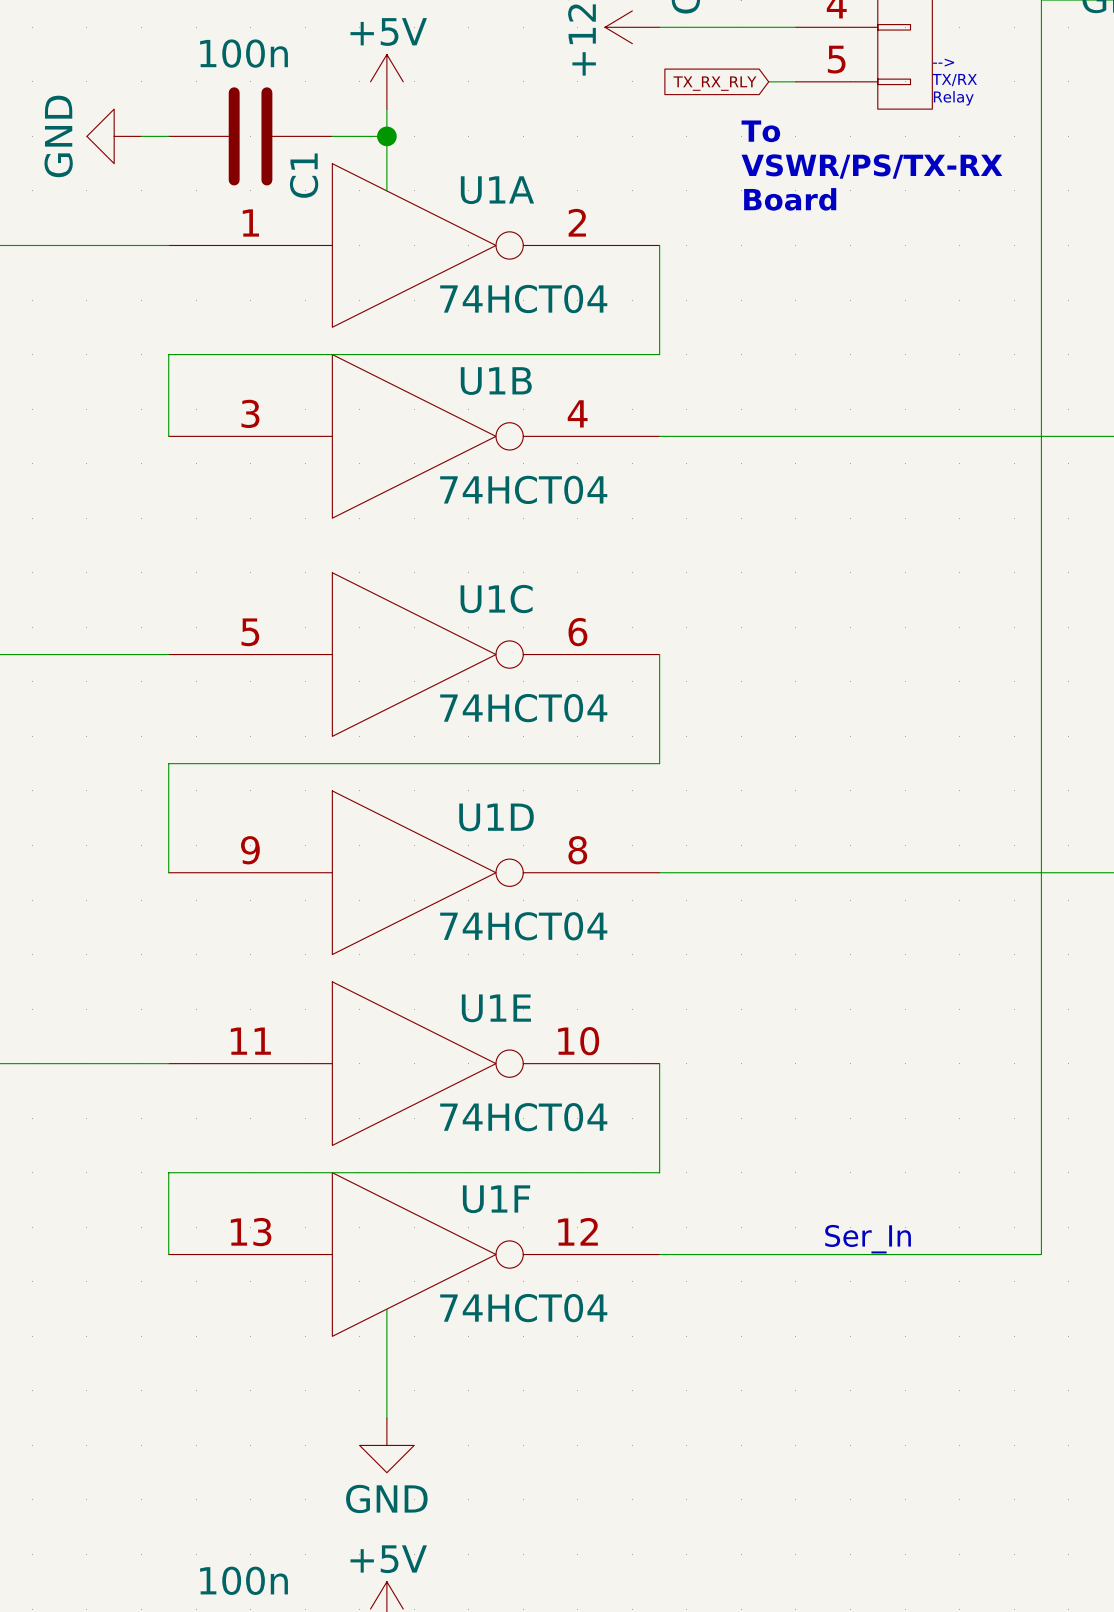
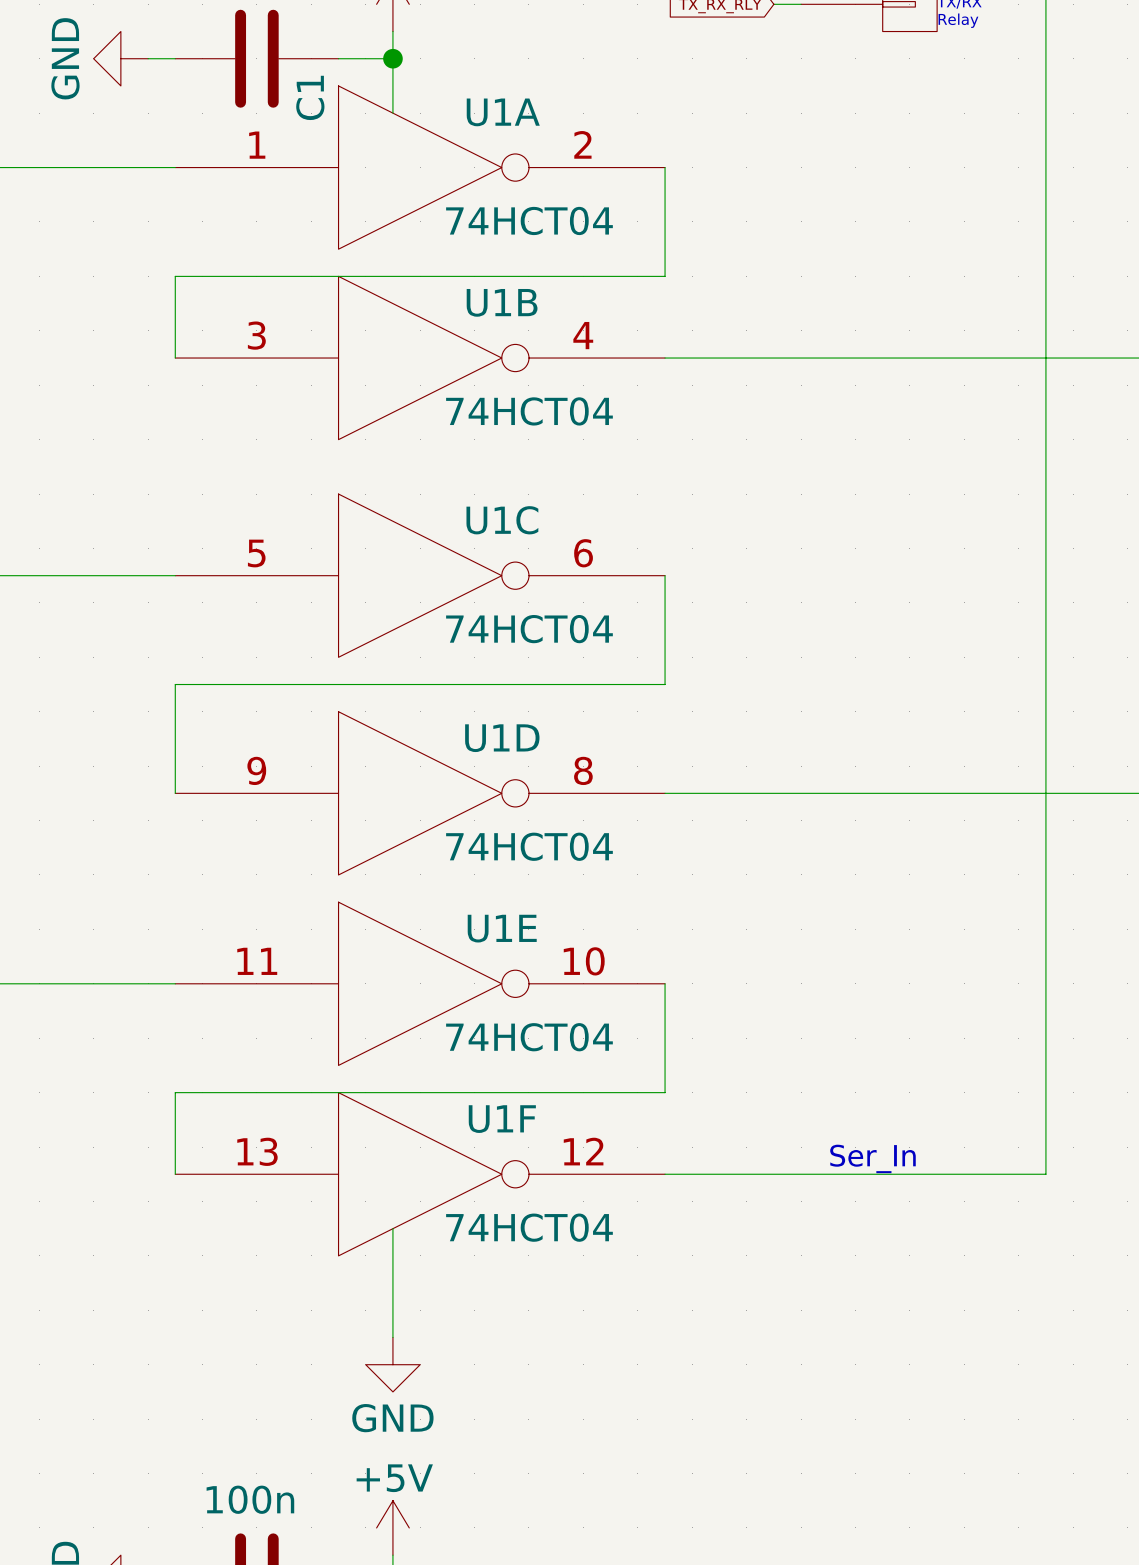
text: To (760, 131) -> none
text: VSWR/PS/TX-RX (871, 166) -> none
text: Board (790, 199) -> none

